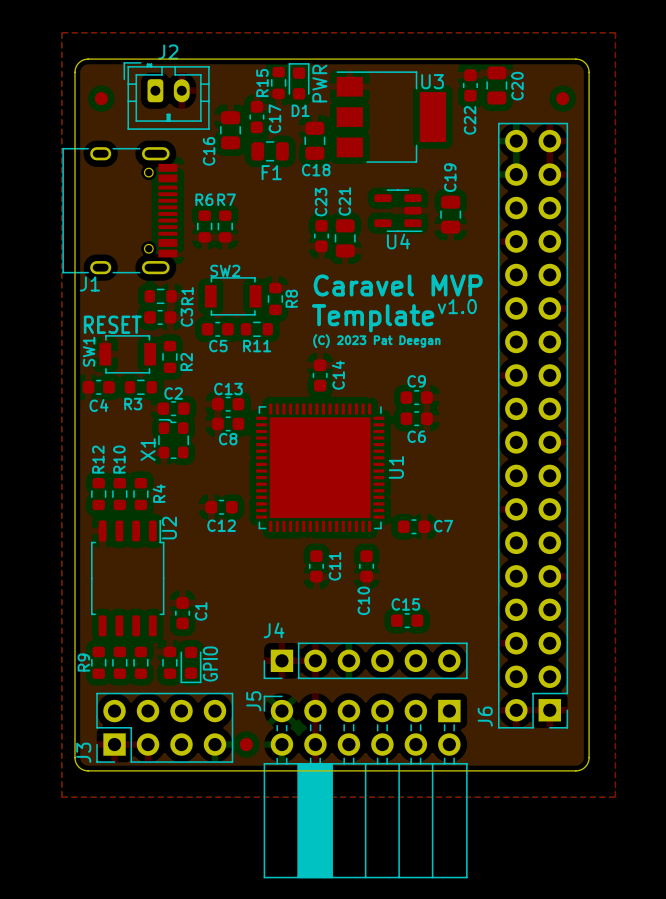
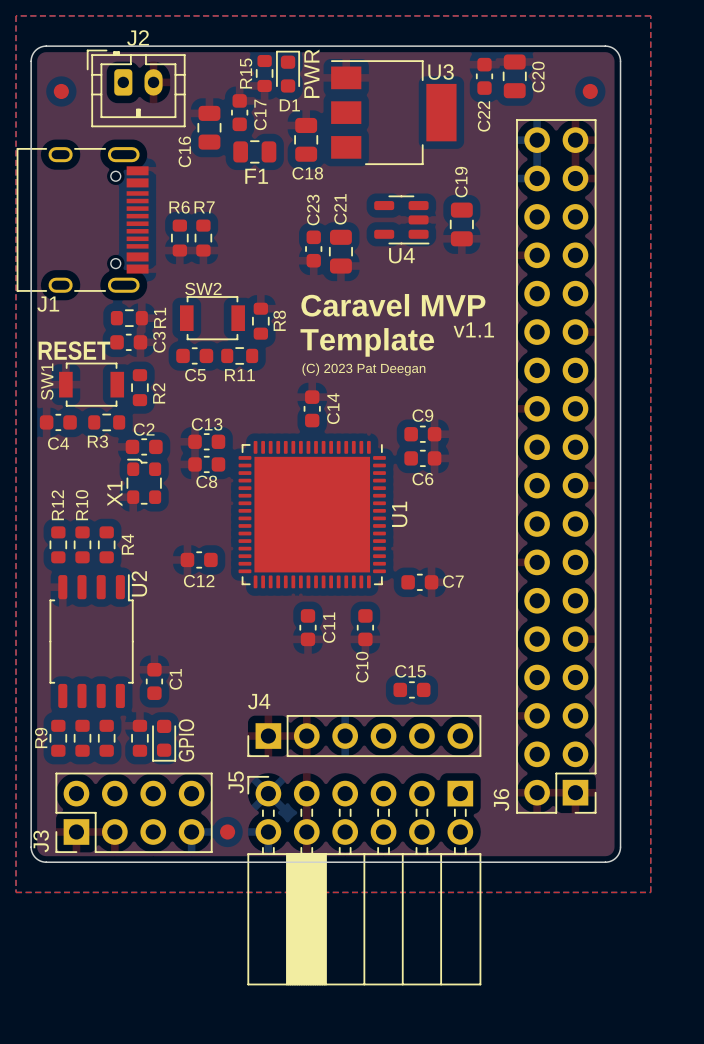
text: v1.0 (457, 306) -> v1.1 (473, 329)

